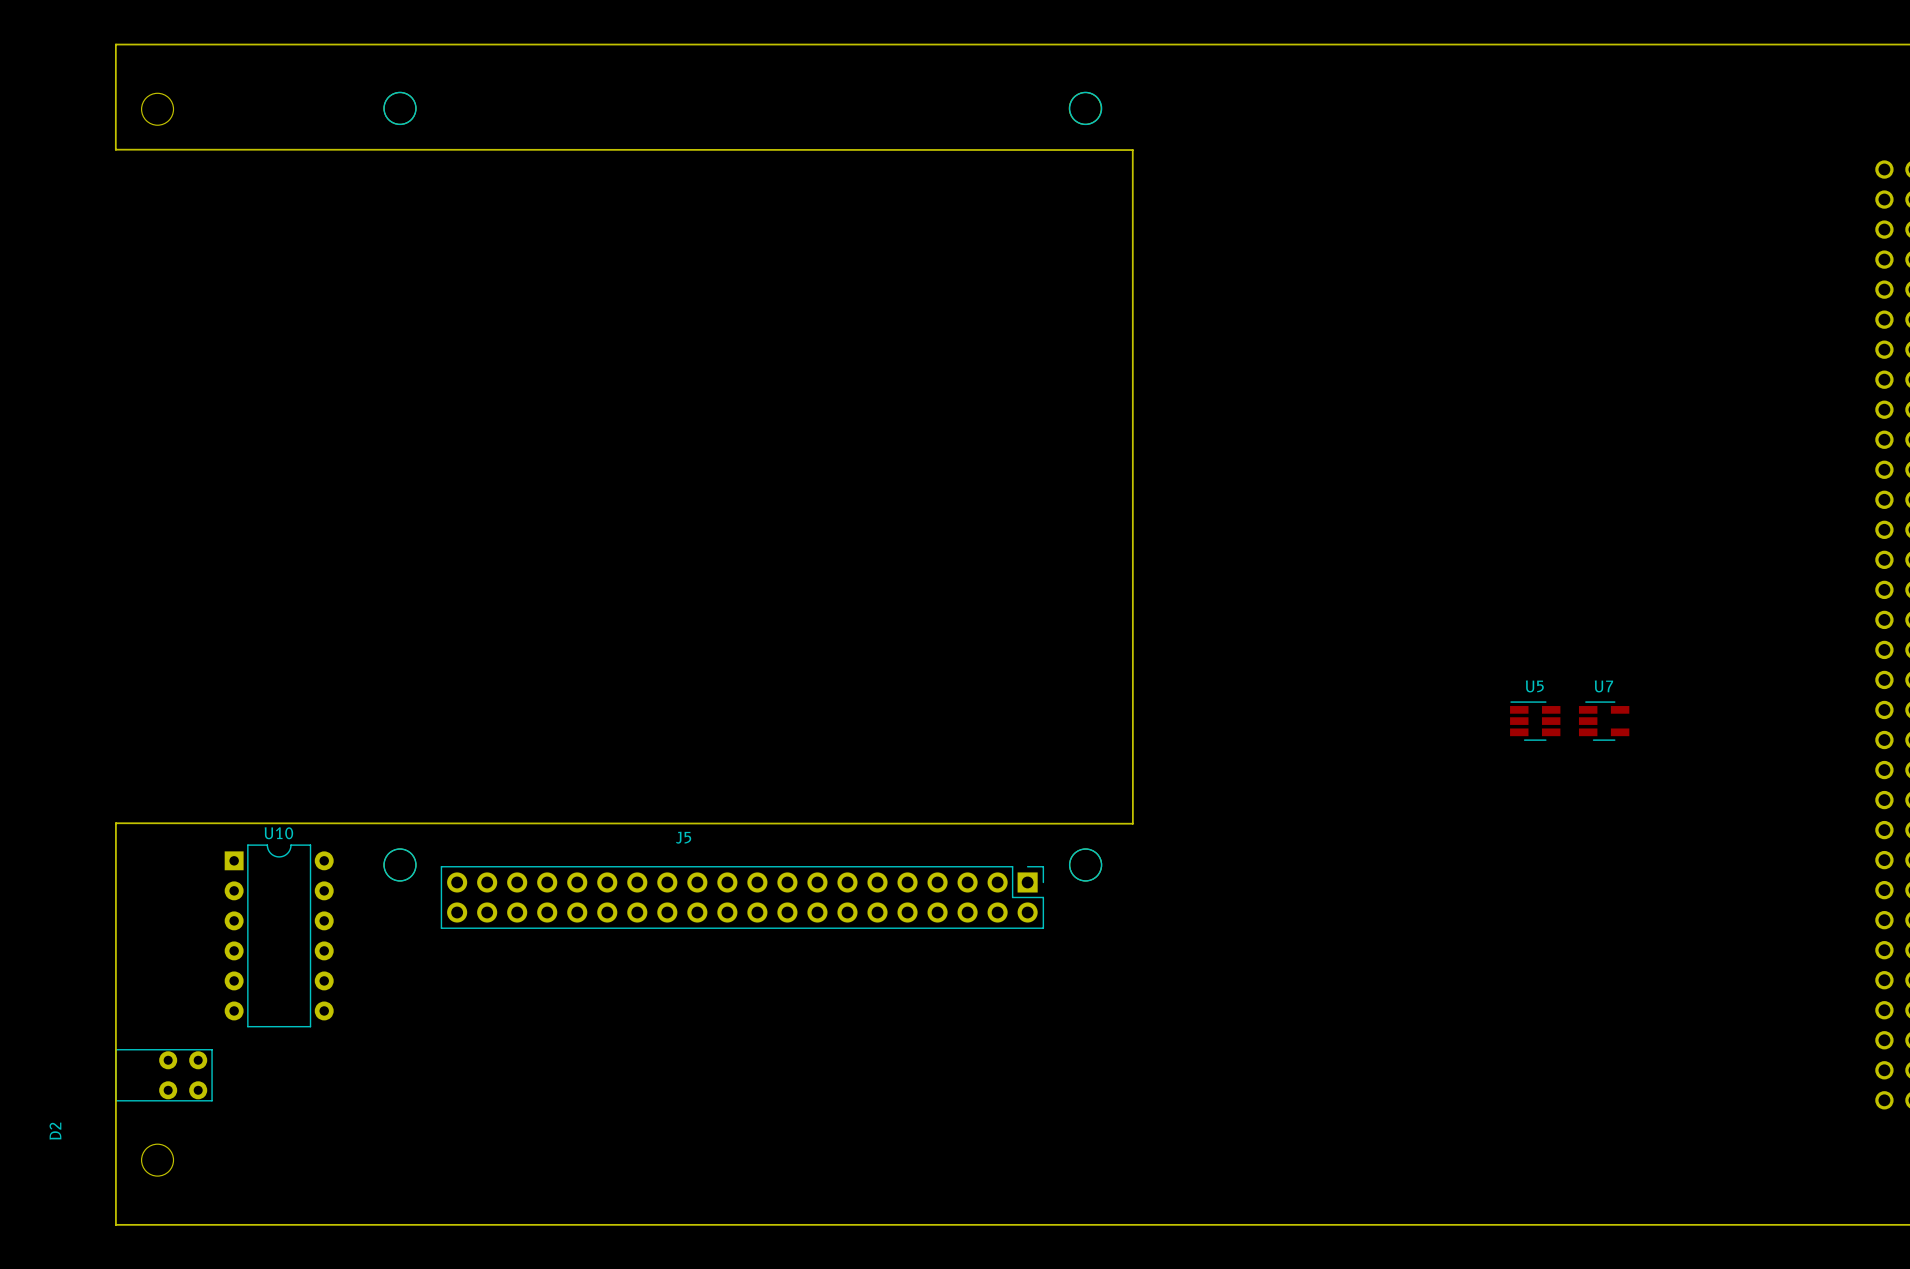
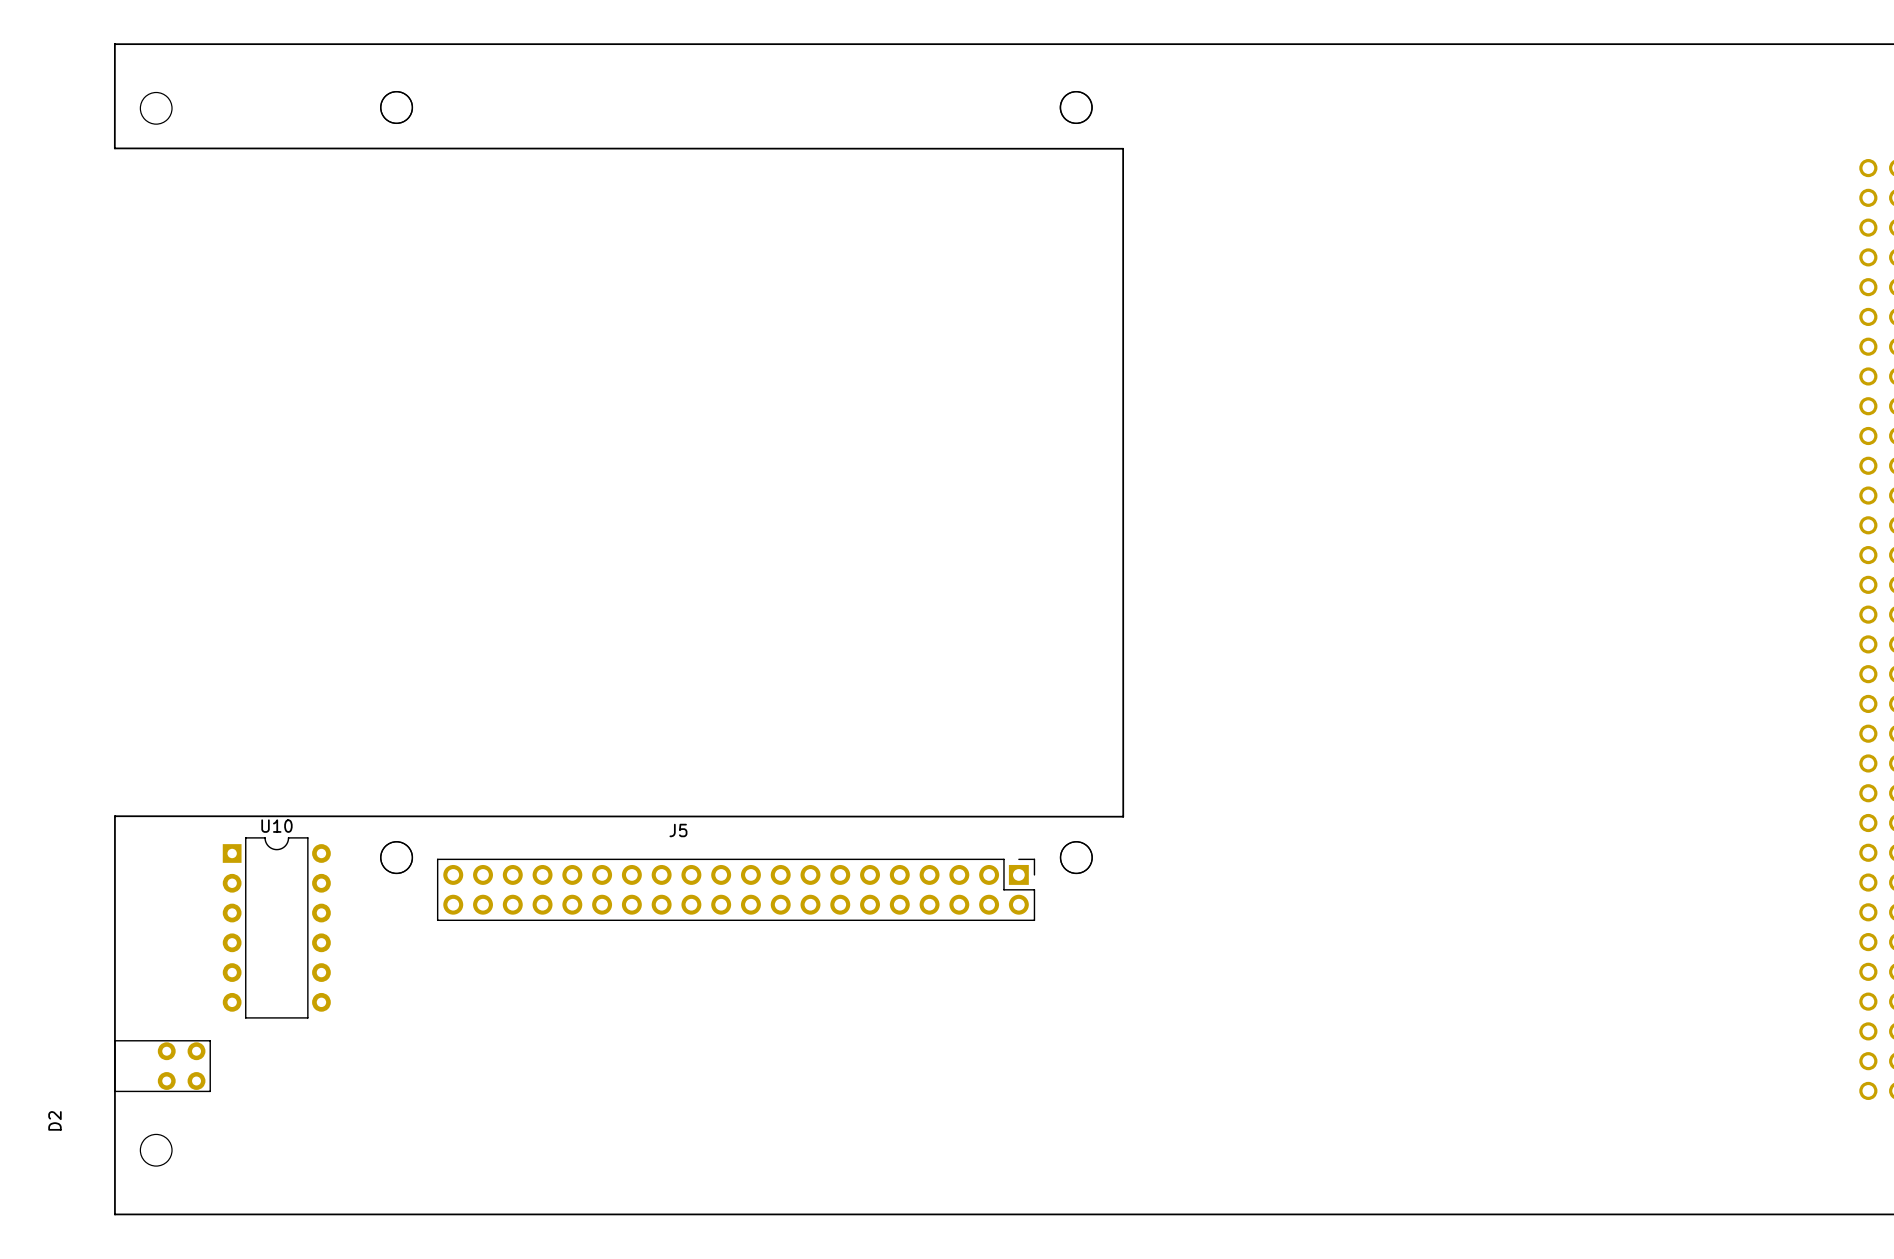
U5: (1535, 721) -> none
U7: (1604, 721) -> none

